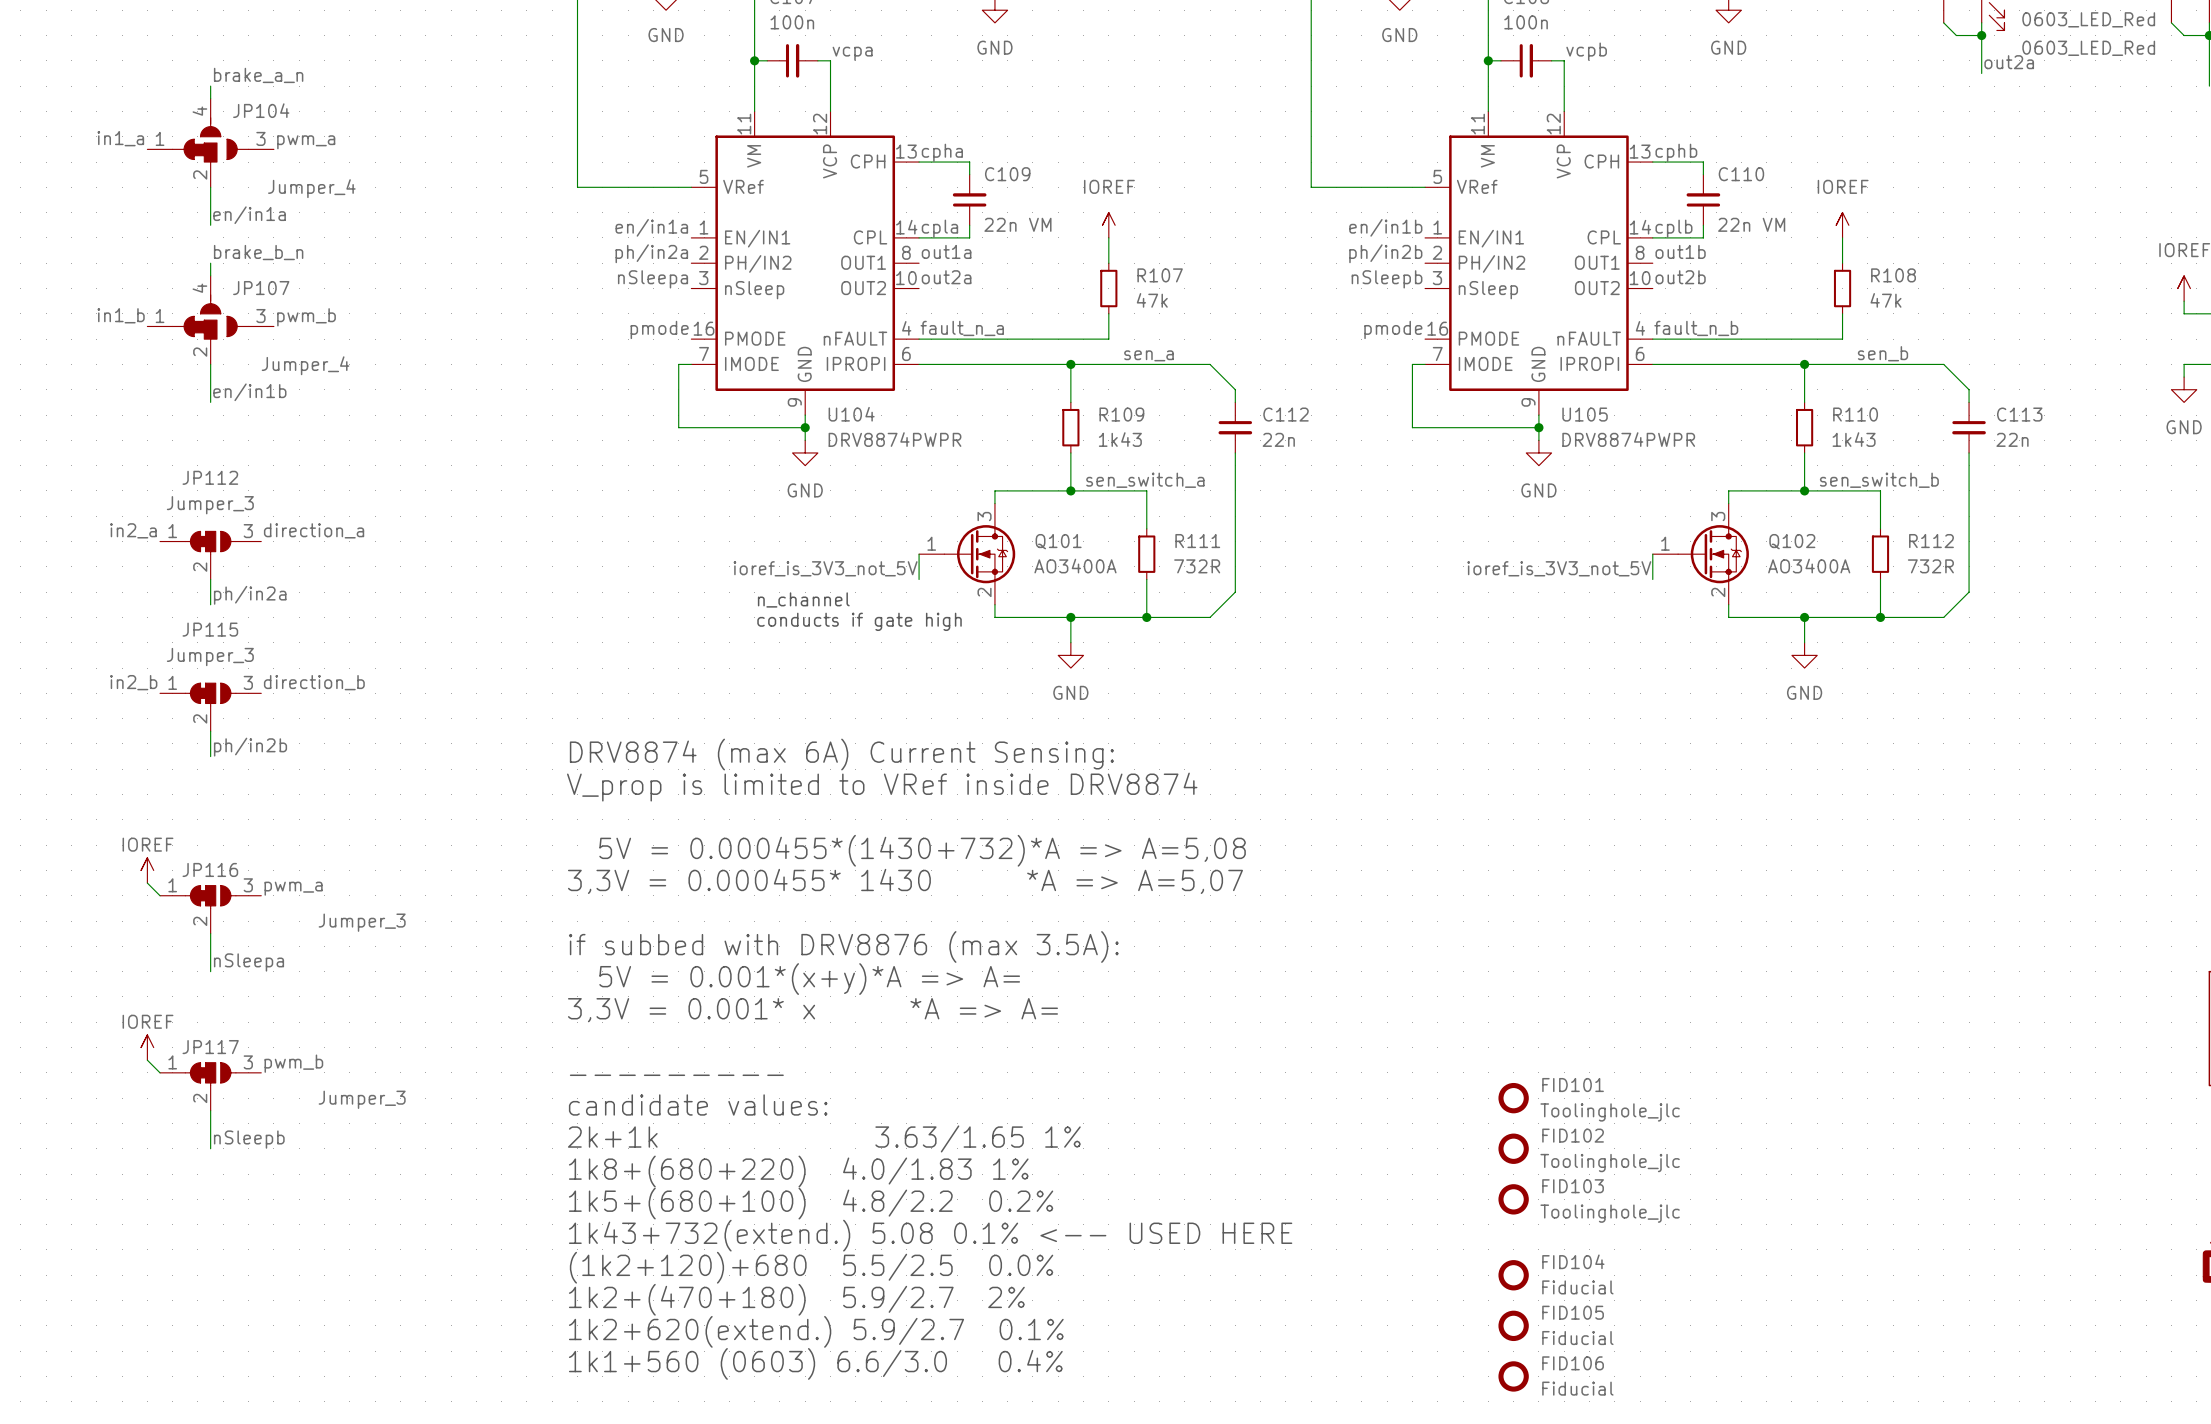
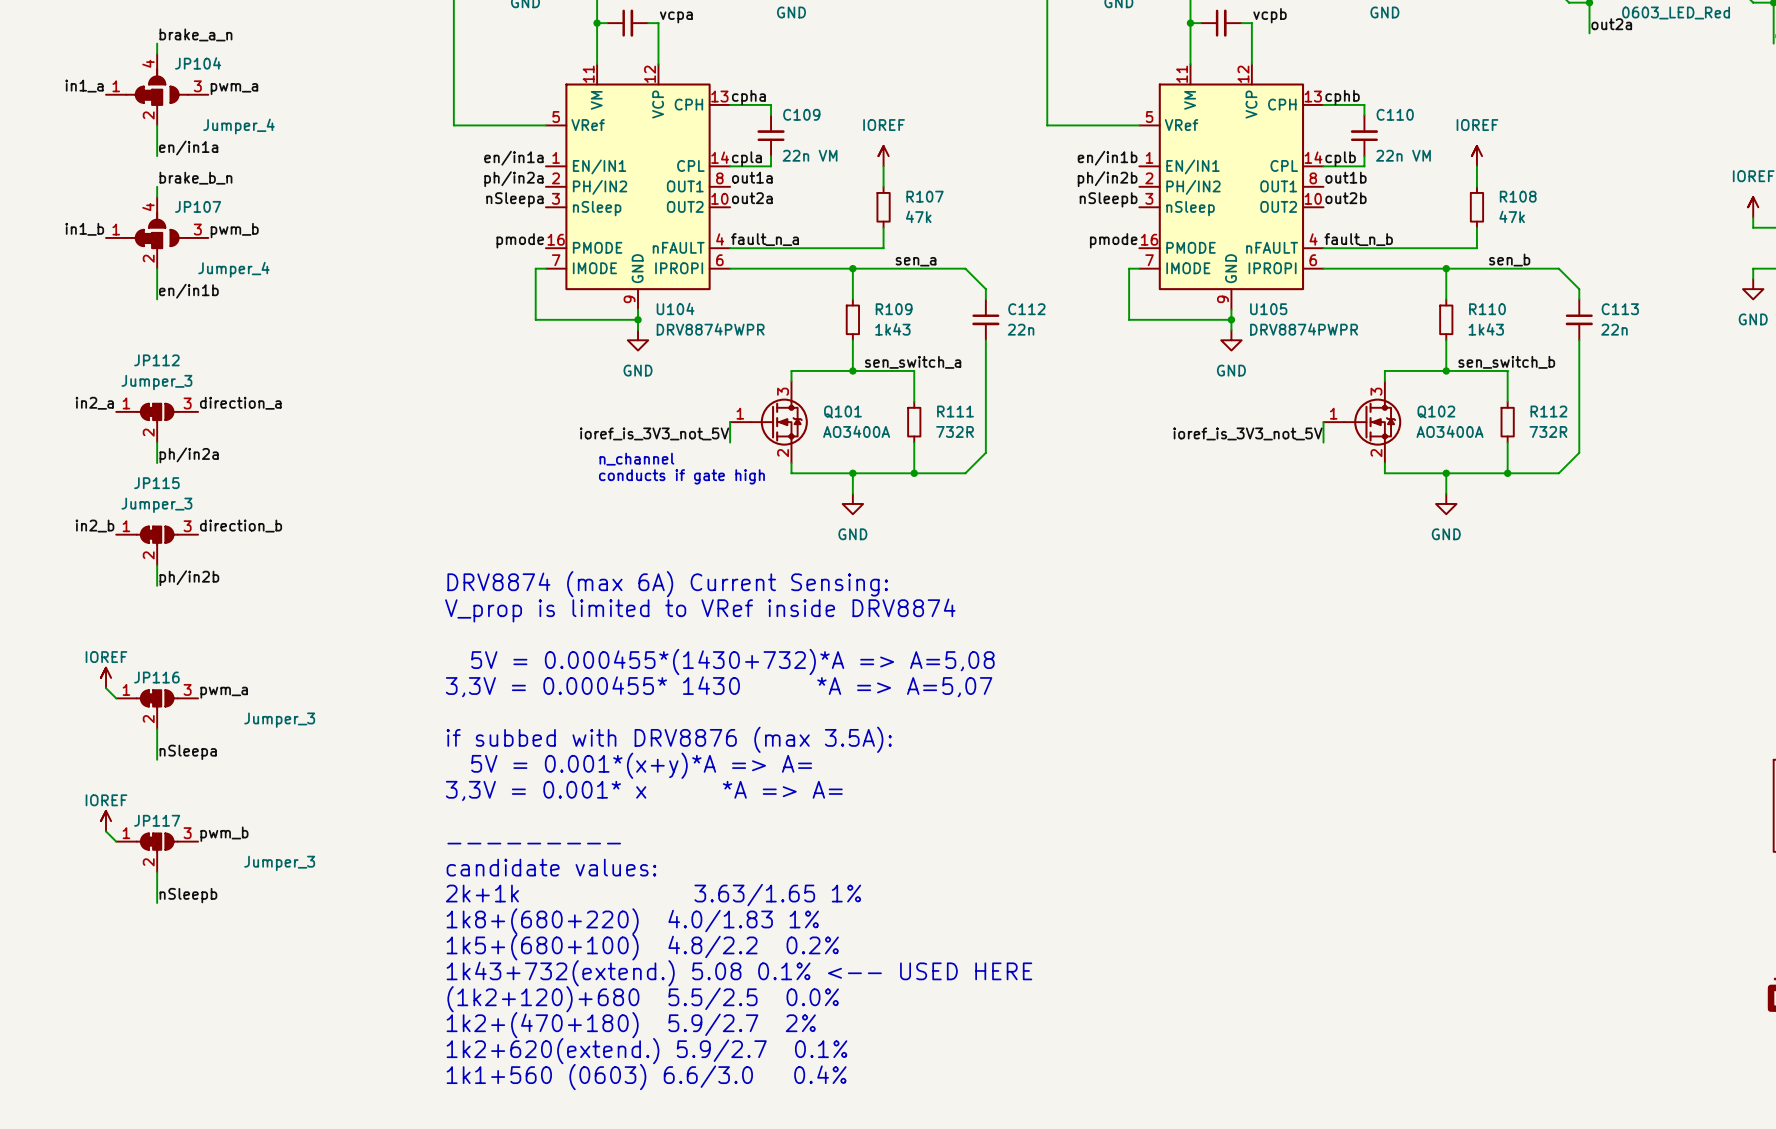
FID101: Toolinghole_jlc (1513, 1098) -> none
FID102: Toolinghole_jlc (1513, 1148) -> none
FID103: Toolinghole_jlc (1513, 1199) -> none
FID104: Fiducial (1513, 1275) -> none
FID105: Fiducial (1513, 1325) -> none
FID106: Fiducial (1513, 1376) -> none

